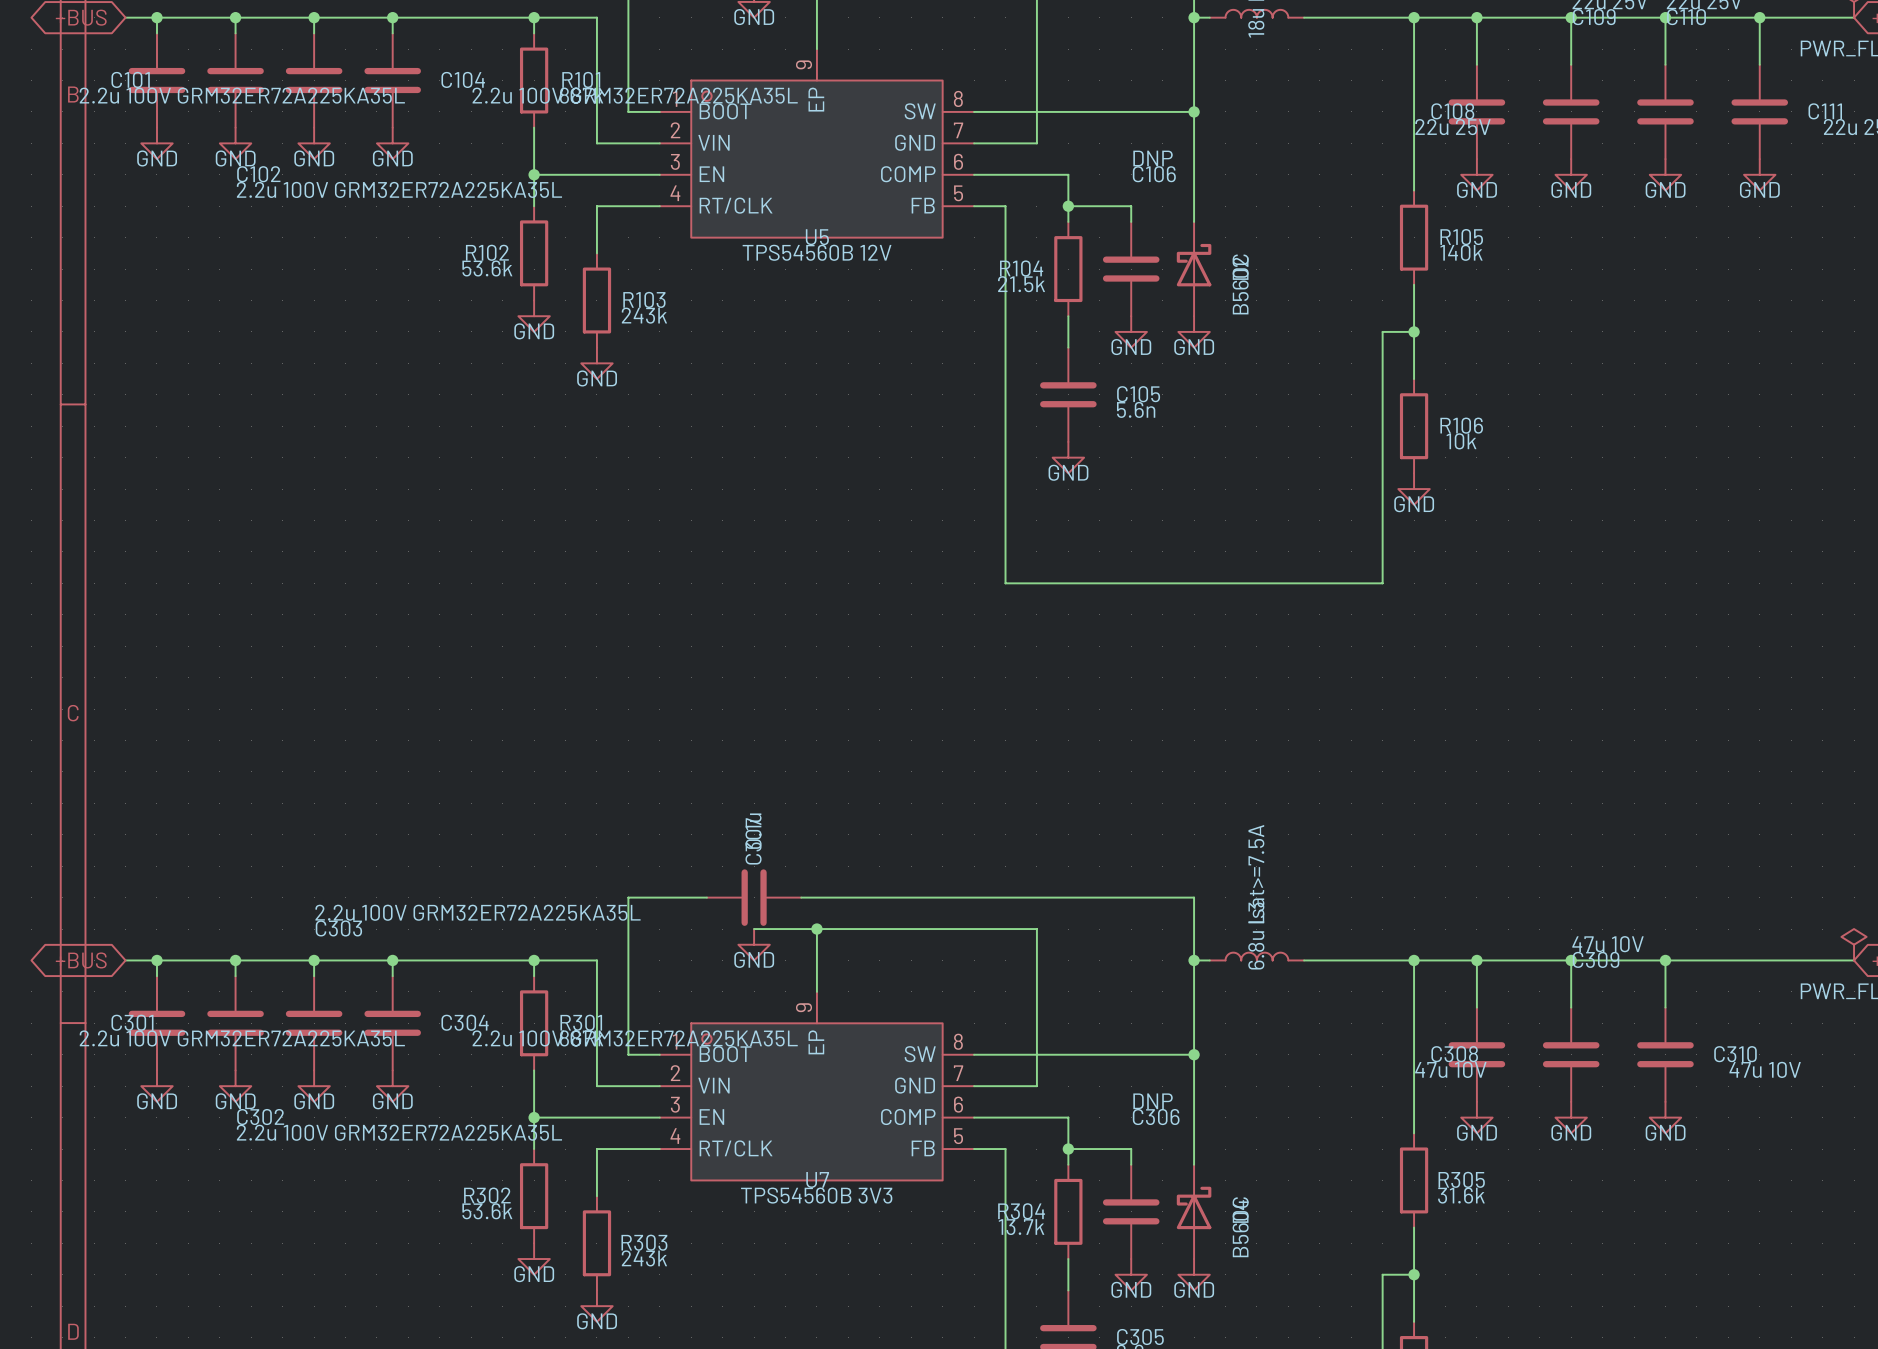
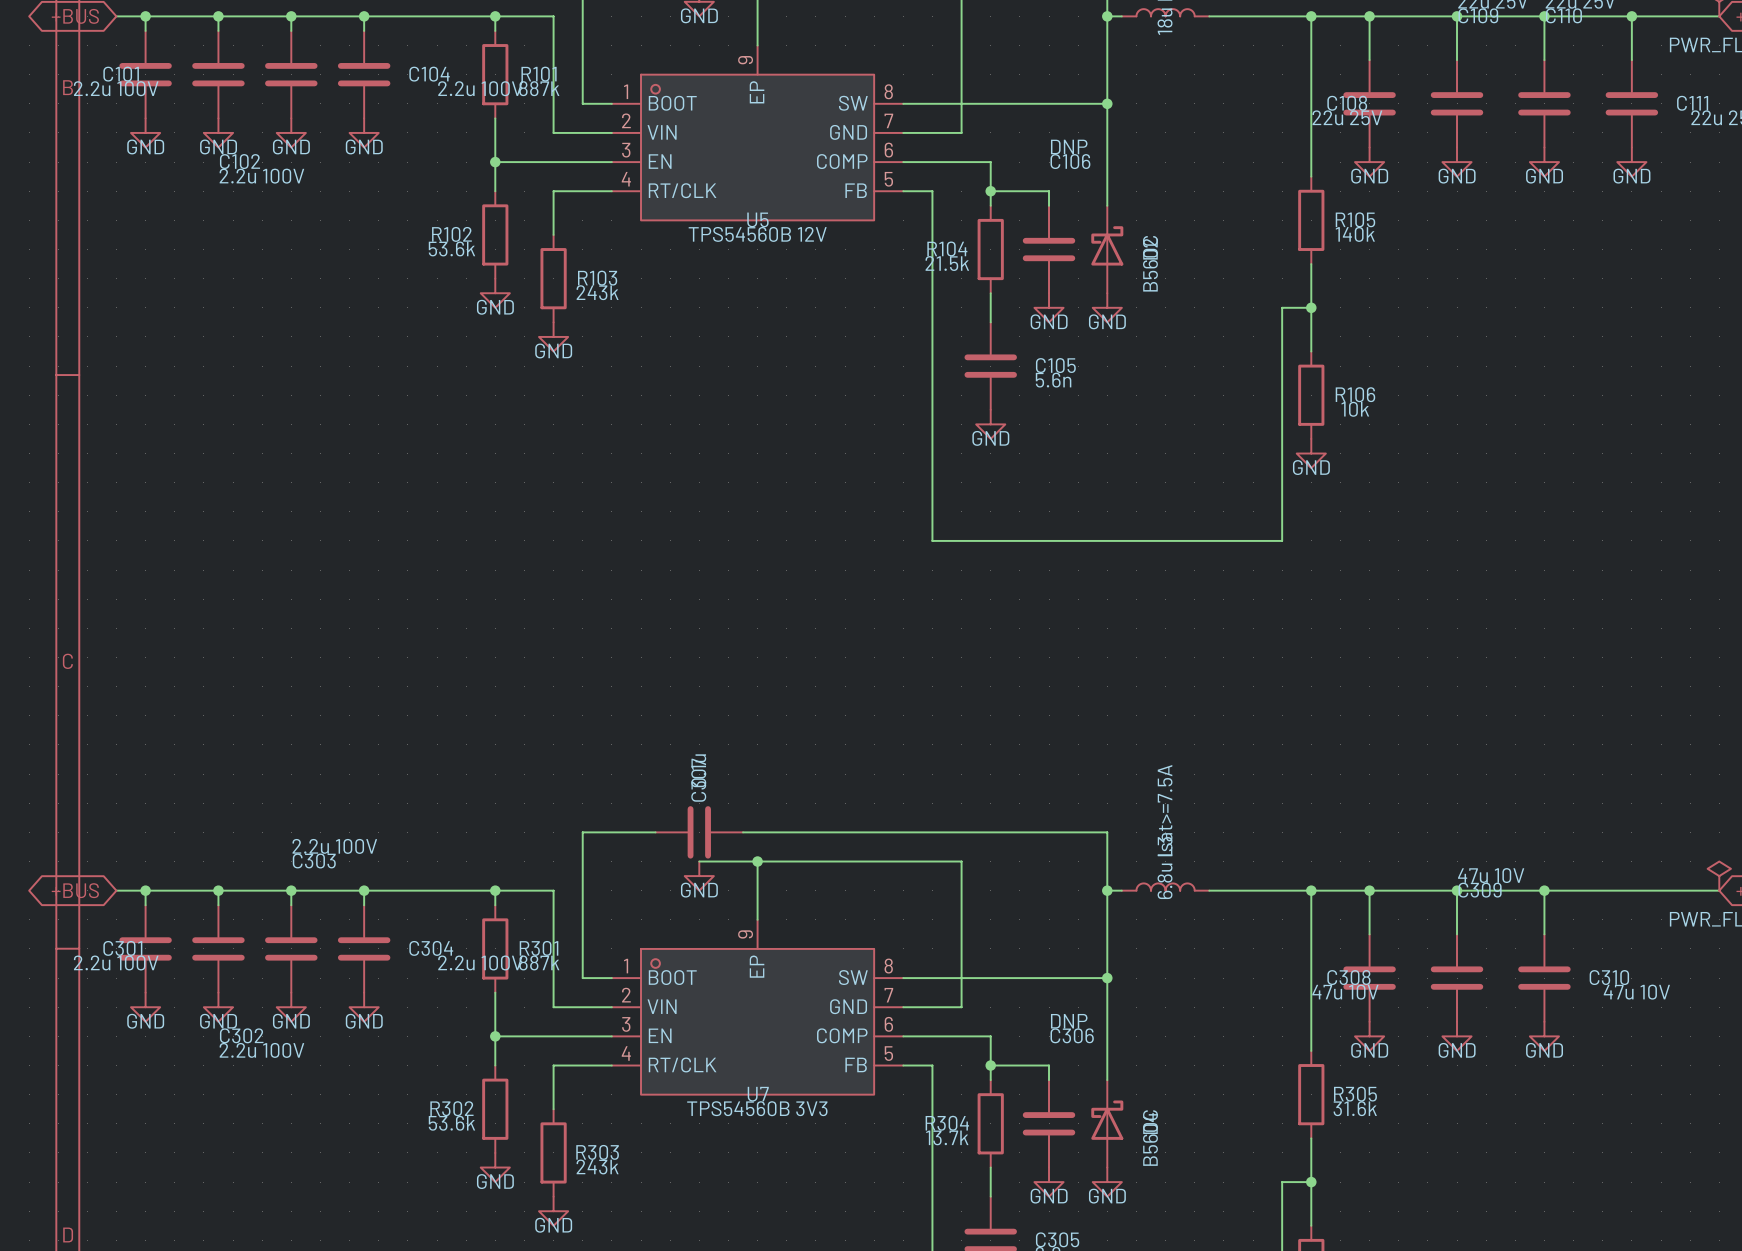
C101 value: 2.2u 100V GRM32ER72A225KA35L (242, 95) -> 2.2u 100V (116, 88)
C104 value: 2.2u 100V GRM32ER72A225KA35L (635, 95) -> 2.2u 100V (480, 88)
C102 value: 2.2u 100V GRM32ER72A225KA35L (399, 189) -> 2.2u 100V (261, 176)
C303 value: 2.2u 100V GRM32ER72A225KA35L (478, 912) -> 2.2u 100V (334, 846)
C301 value: 2.2u 100V GRM32ER72A225KA35L (242, 1038) -> 2.2u 100V (116, 962)
C304 value: 2.2u 100V GRM32ER72A225KA35L (635, 1038) -> 2.2u 100V (480, 962)
C302 value: 2.2u 100V GRM32ER72A225KA35L (399, 1132) -> 2.2u 100V (261, 1050)

